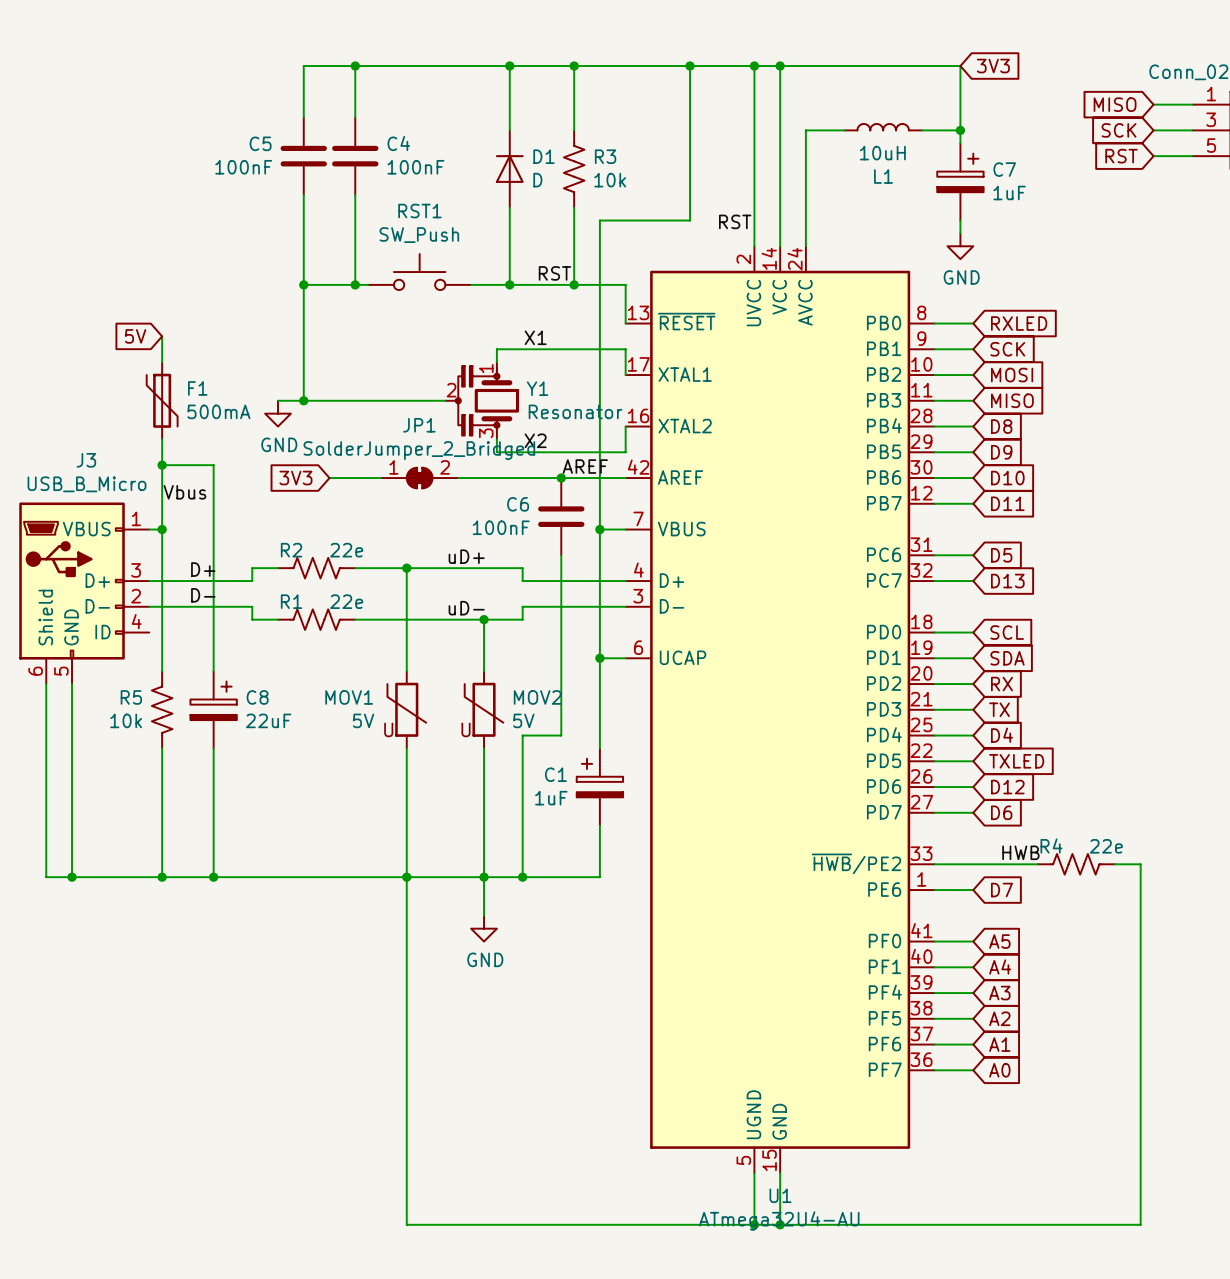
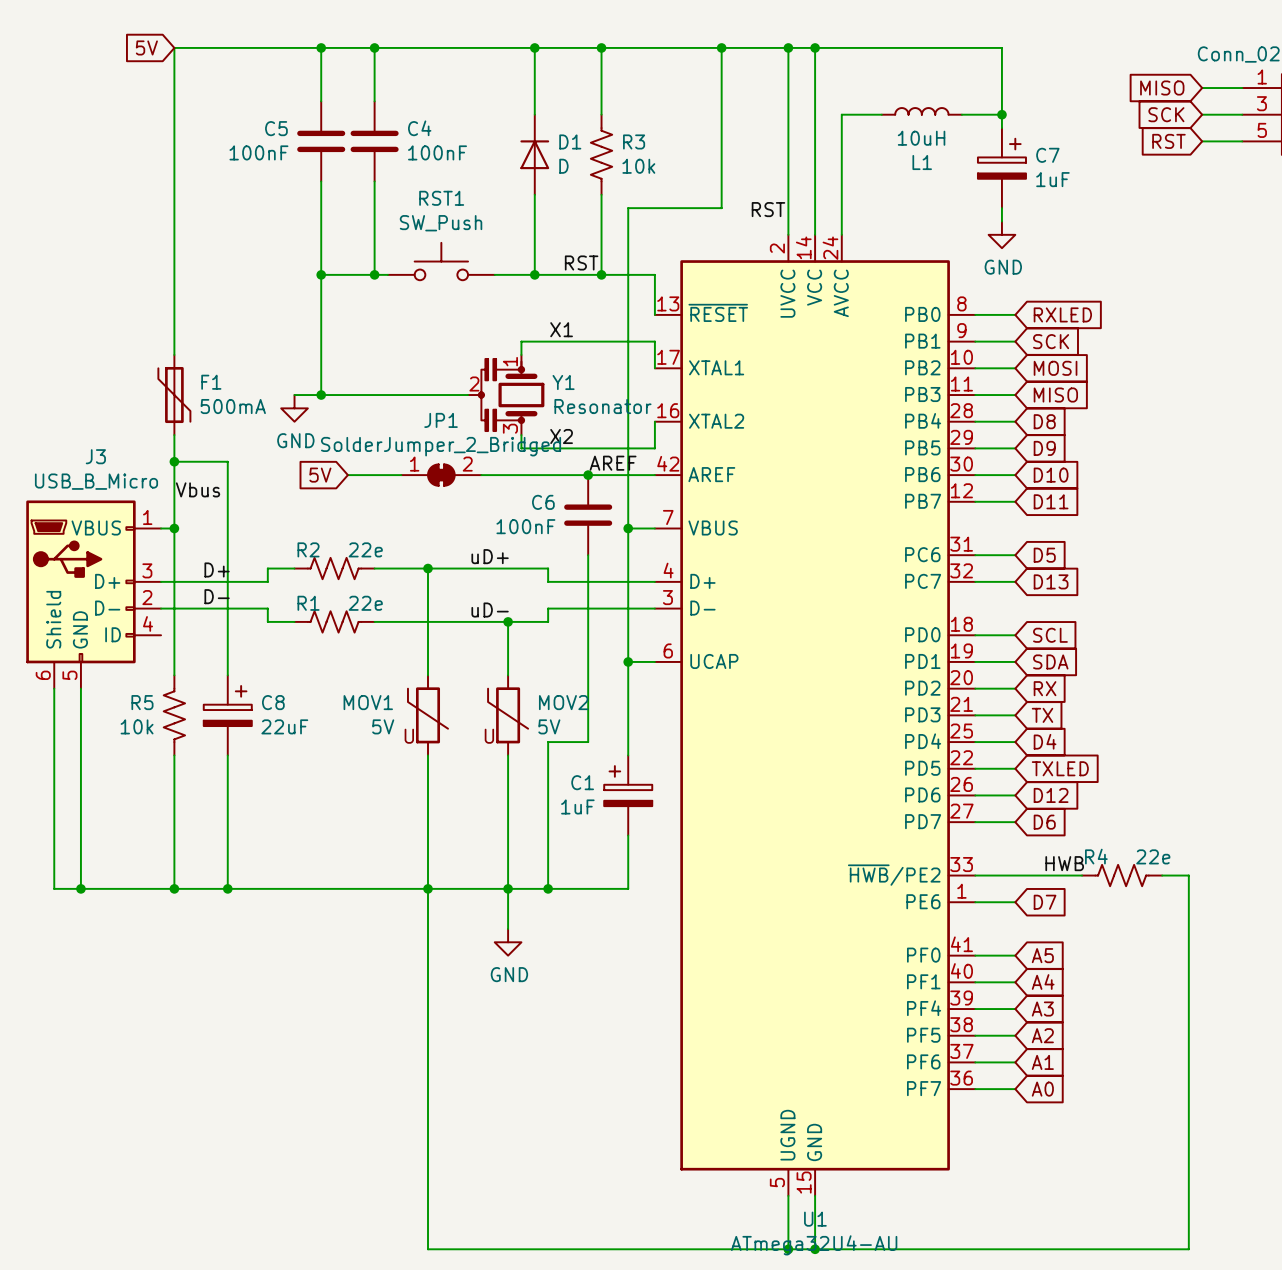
global label: none -> 5V (146, 47)
wire: none -> (321, 47) (174, 47) (174, 328)
junction: none -> (321, 47)
global label: 3V3 (993, 66) -> none
global label: 5V (135, 336) -> none
global label: 3V3 (295, 478) -> 5V (320, 475)

